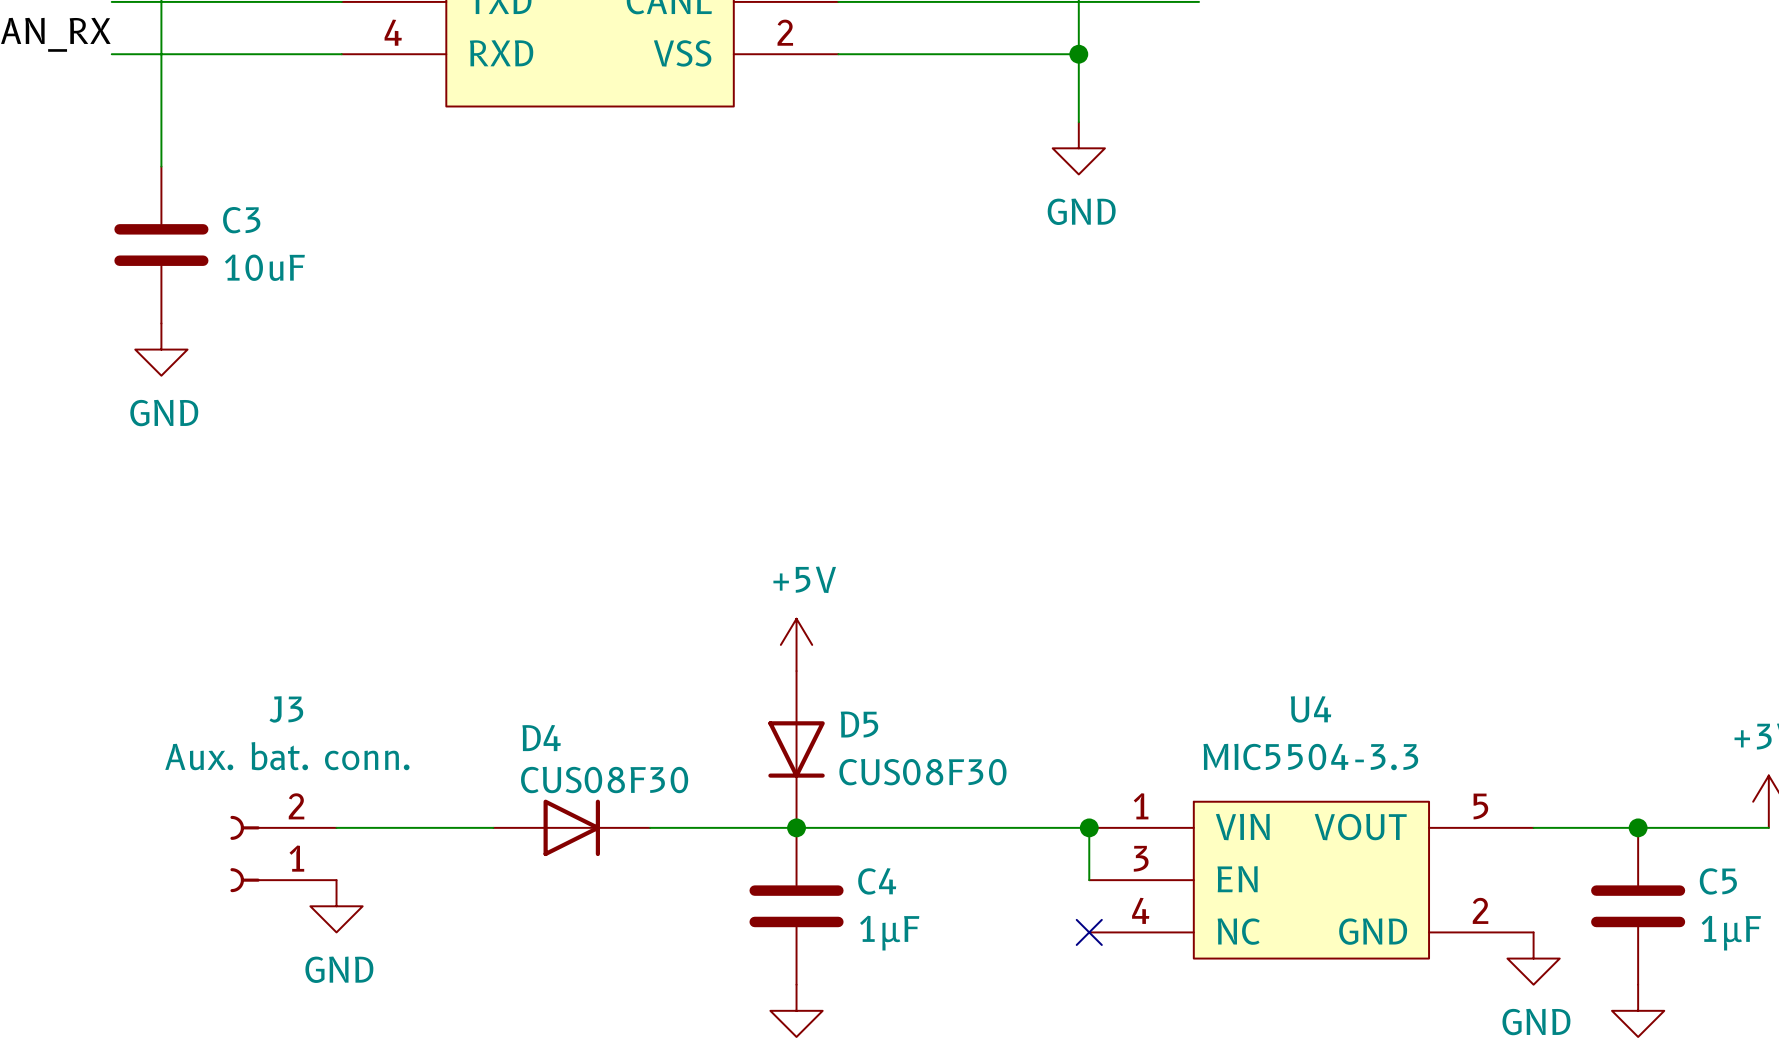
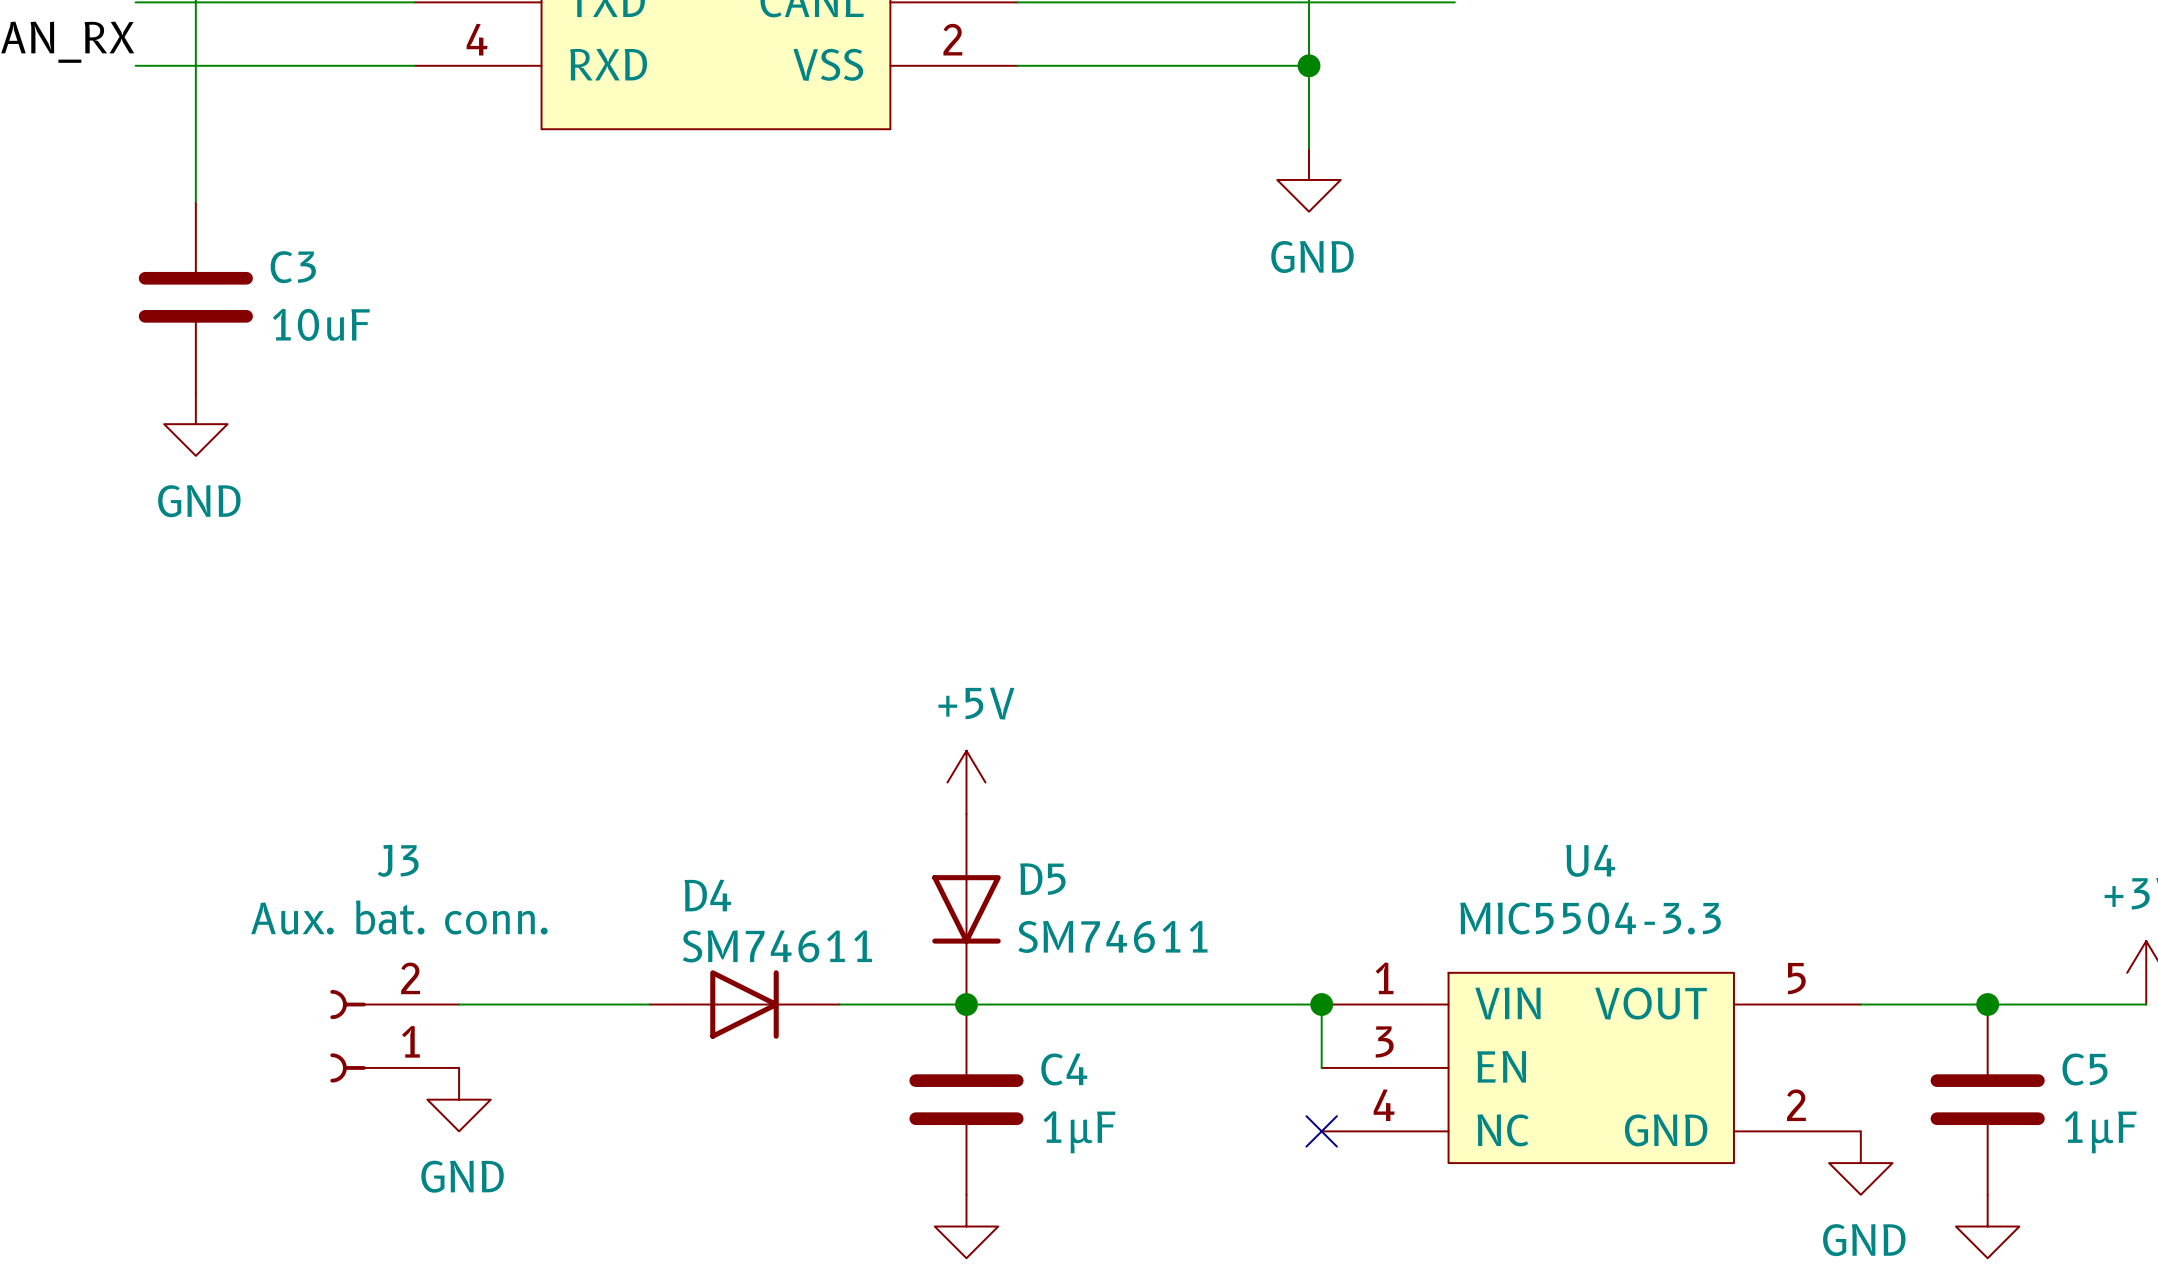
D5 value: CUS08F30 (922, 772) -> SM74611 (1112, 936)
D4 value: CUS08F30 (604, 780) -> SM74611 (777, 946)
D4 position: (571, 827) -> (744, 1004)
J3 position: (283, 854) -> (394, 1036)
power symbol position: GND (336, 906) -> GND (459, 1099)

